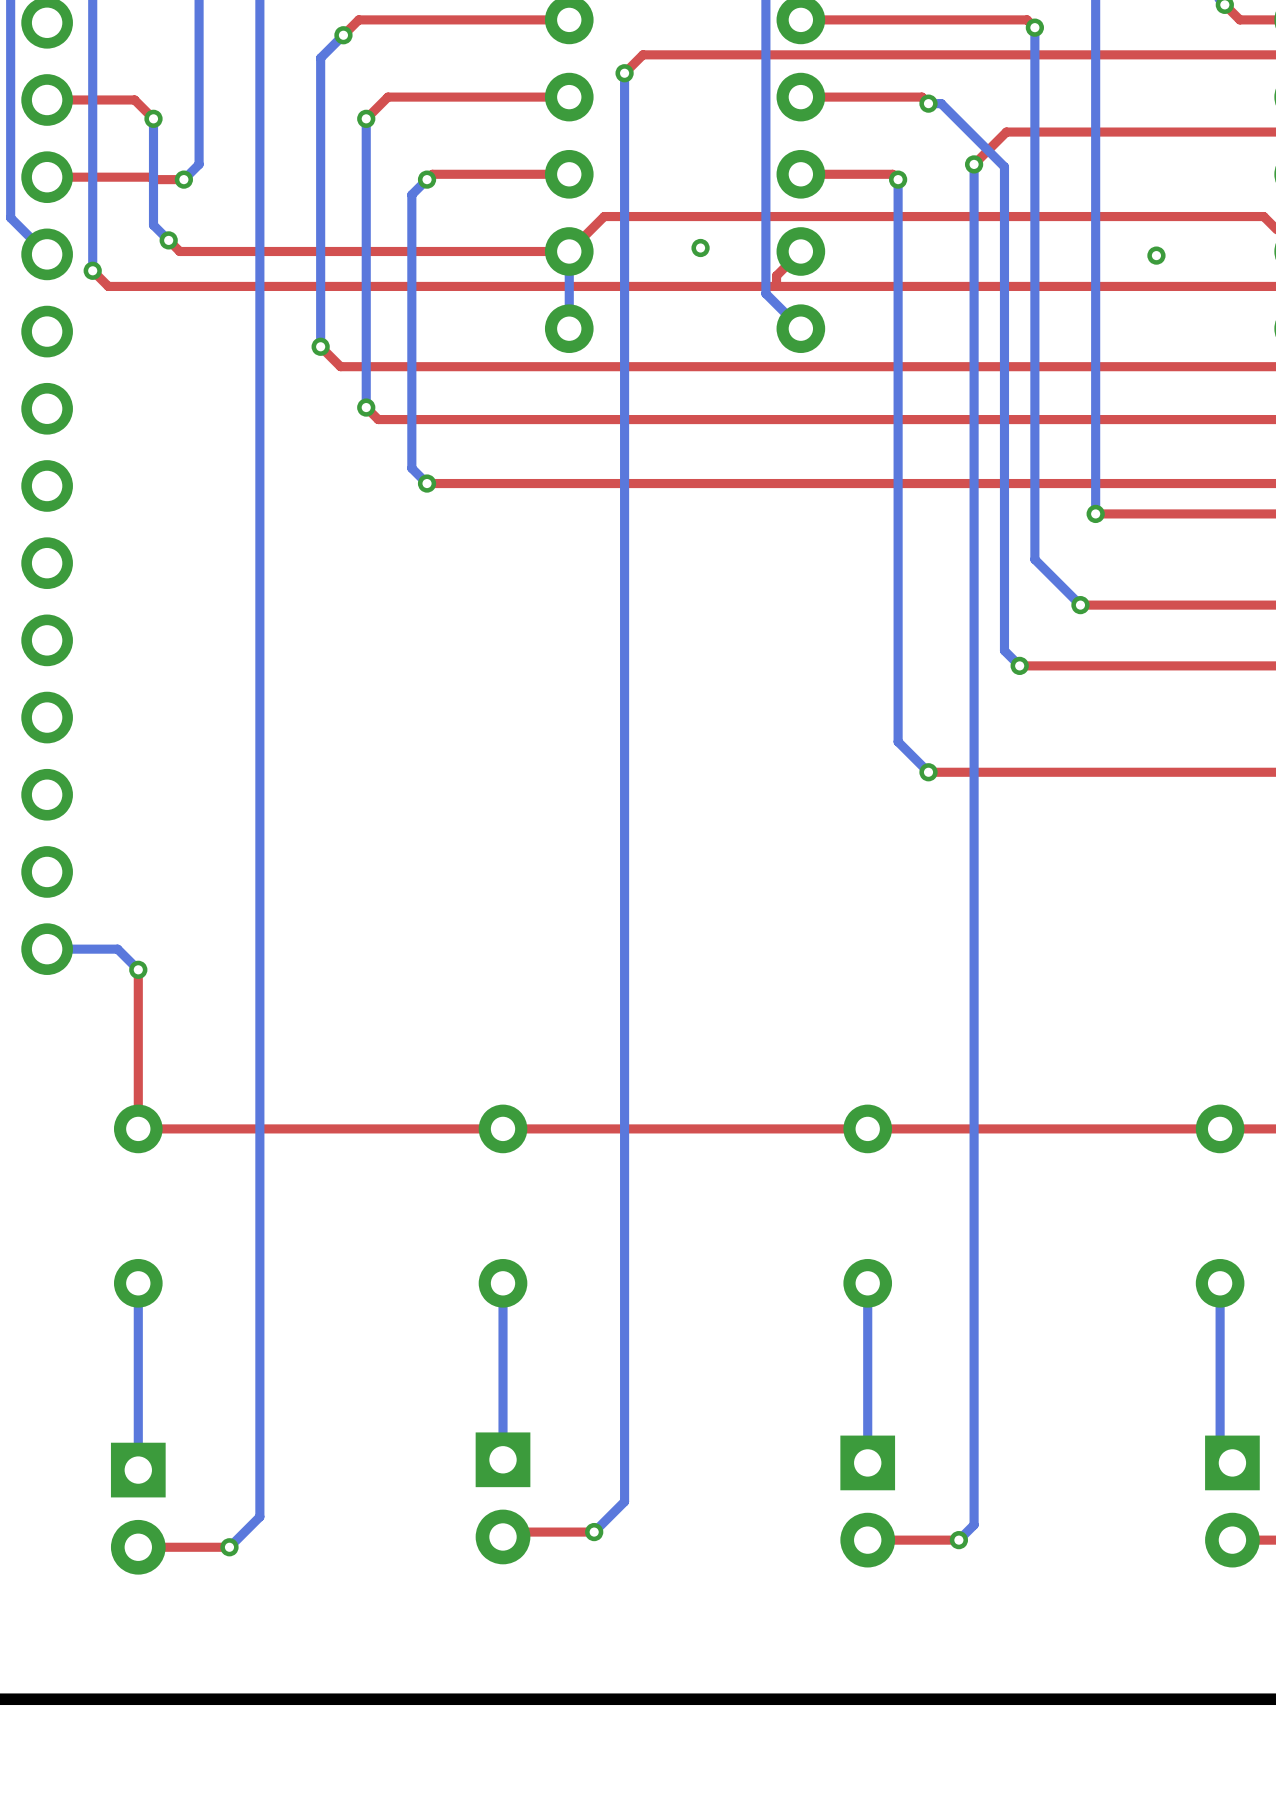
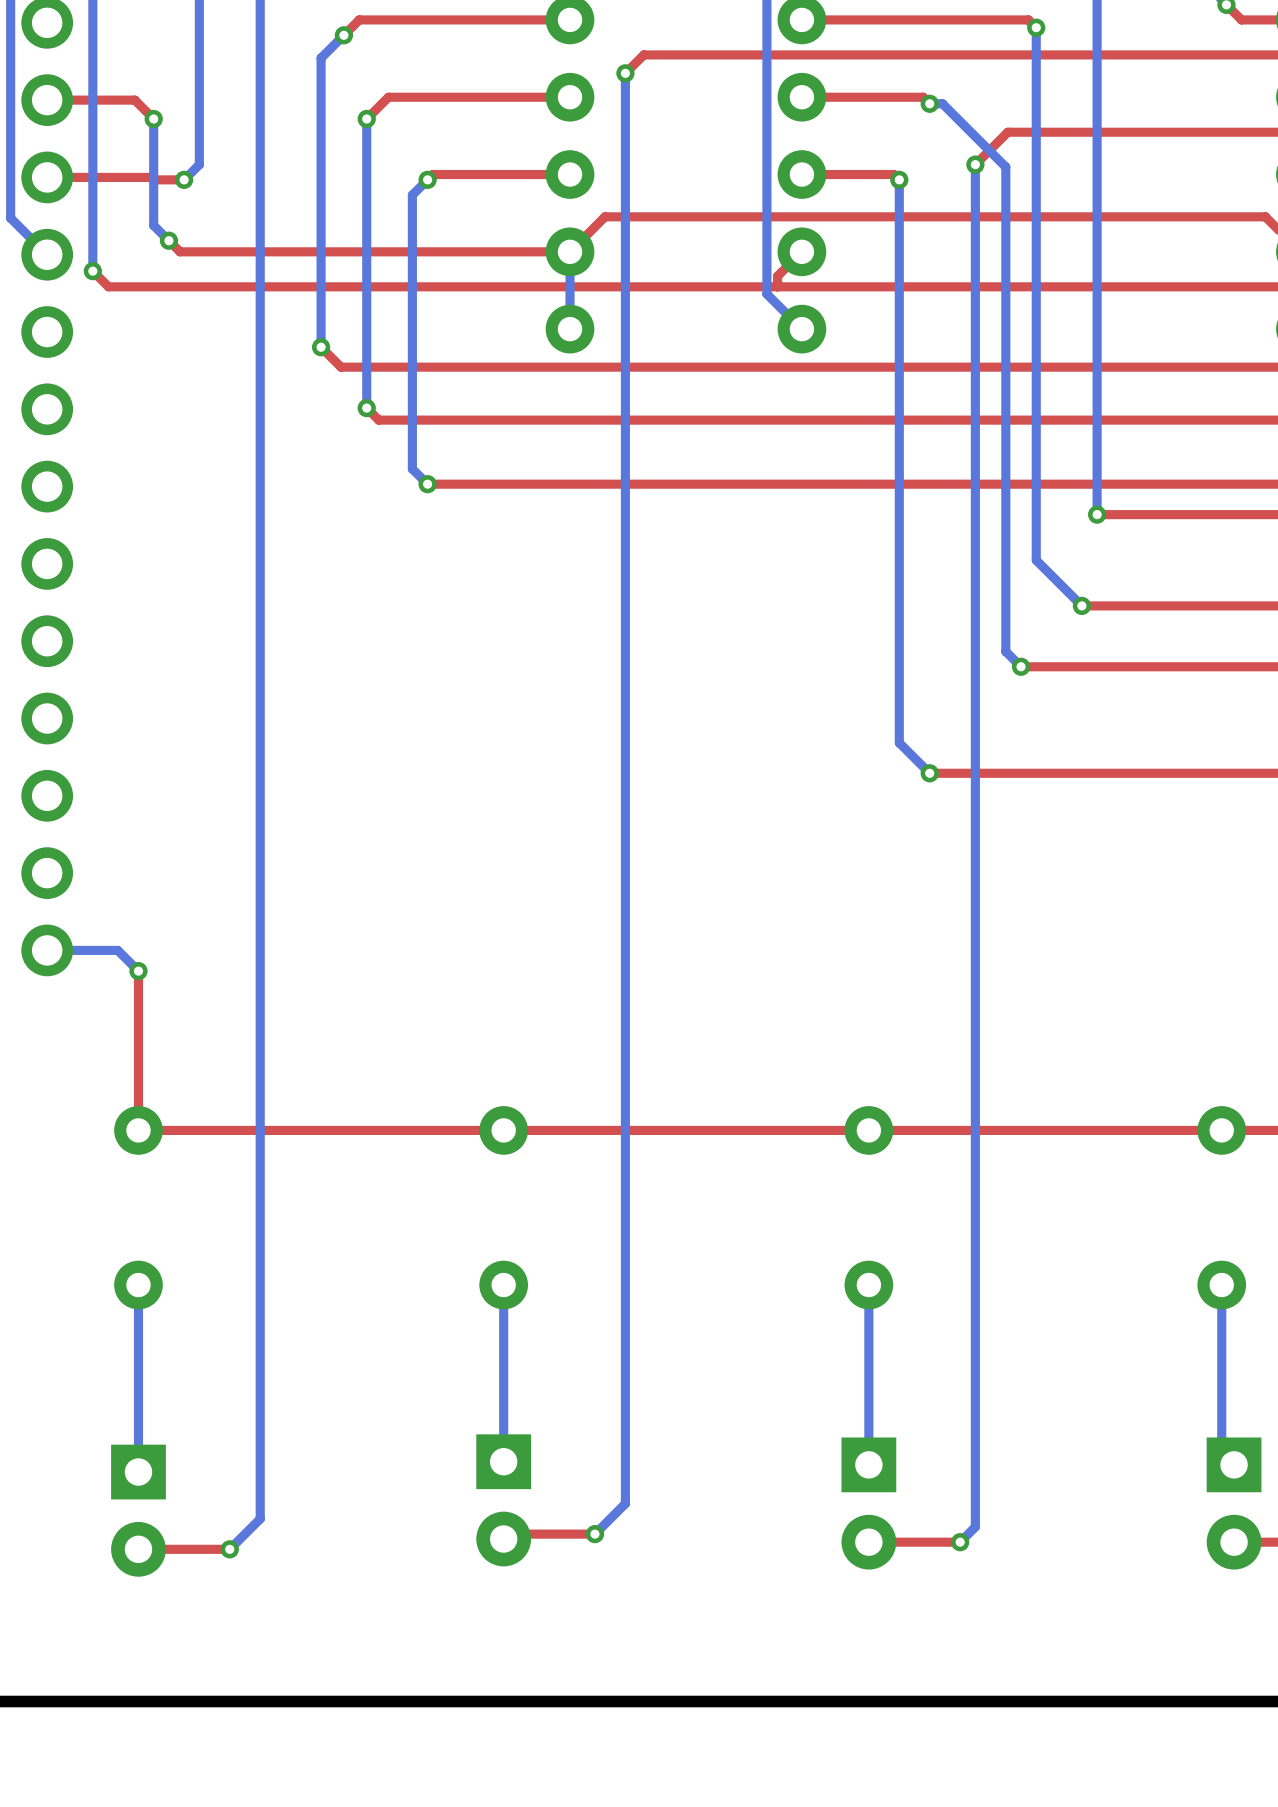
via: (700, 247) -> none
via: (1156, 255) -> none

